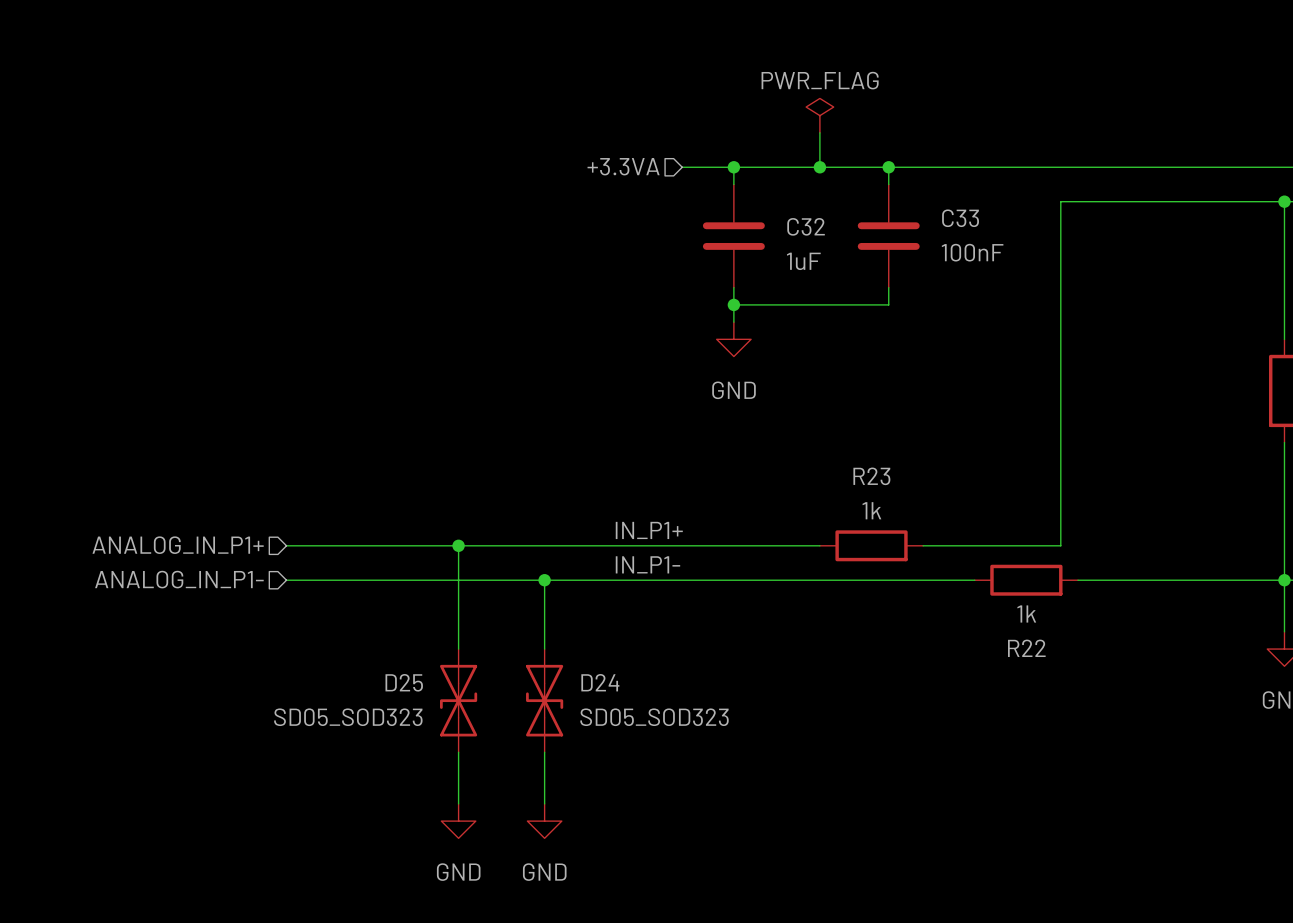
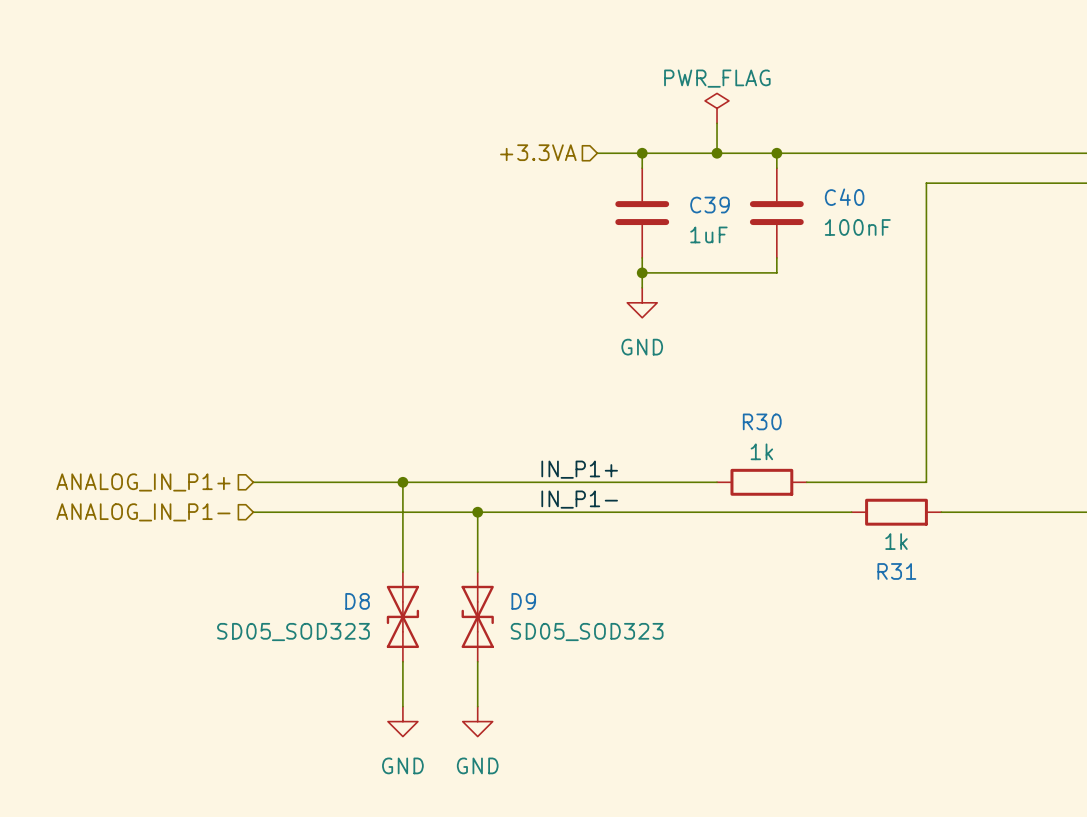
C33 name: C33 (960, 218) -> C40 (844, 197)
C32 name: C32 (806, 226) -> C39 (710, 205)
R23 name: R23 (871, 476) -> R30 (762, 421)
R22 name: R22 (1026, 648) -> R31 (896, 571)
D25 name: D25 (404, 682) -> D8 (357, 601)
D24 name: D24 (600, 682) -> D9 (523, 601)

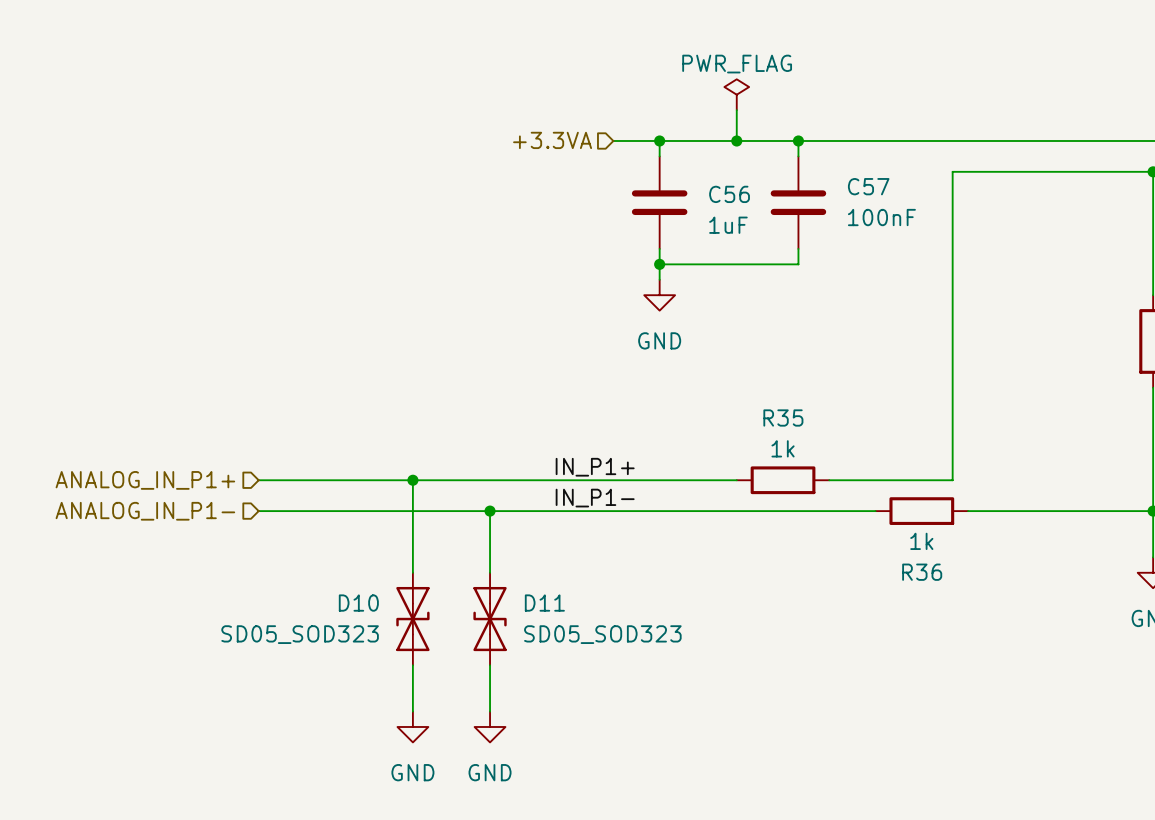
C40 name: C40 (844, 197) -> C57 (868, 186)
C39 name: C39 (710, 205) -> C56 (729, 194)
R30 name: R30 (762, 421) -> R35 (783, 417)
R31 name: R31 (896, 571) -> R36 (922, 572)
D8 name: D8 (357, 601) -> D10 (358, 603)
D9 name: D9 (523, 601) -> D11 (544, 603)

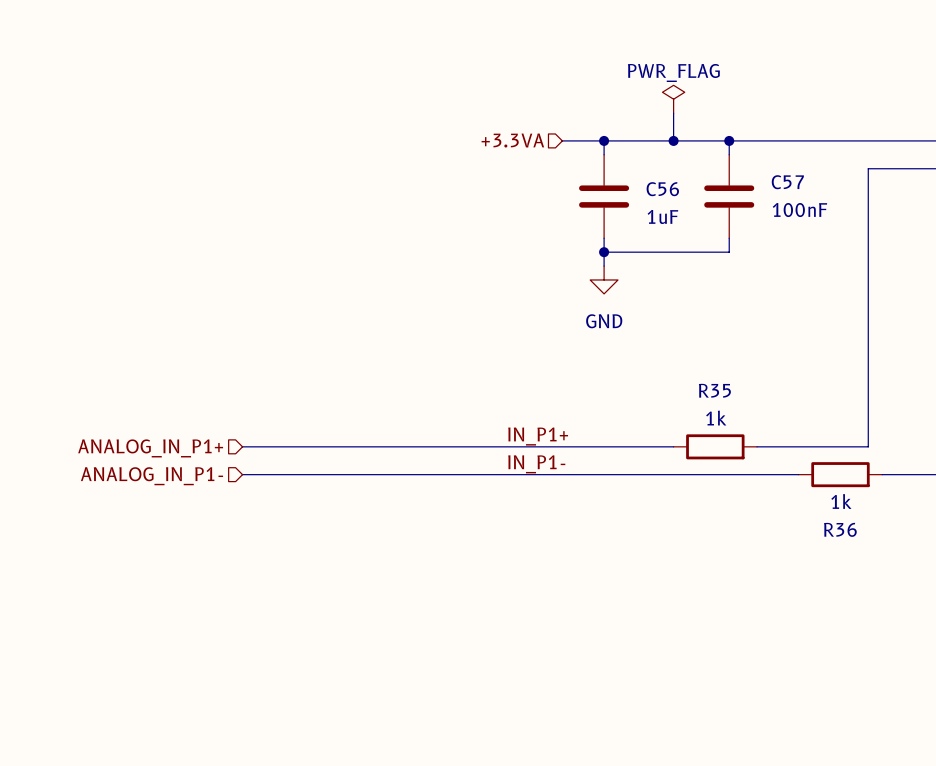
wire: (412, 480) (412, 572) -> none
junction: (412, 480) -> none
wire: (490, 511) (490, 572) -> none
junction: (490, 511) -> none
D10: SD05_SOD323 (412, 619) -> none
D11: SD05_SOD323 (490, 619) -> none
wire: (412, 665) (412, 711) -> none
wire: (490, 665) (490, 711) -> none
power symbol: GND (412, 726) -> none
power symbol: GND (490, 726) -> none

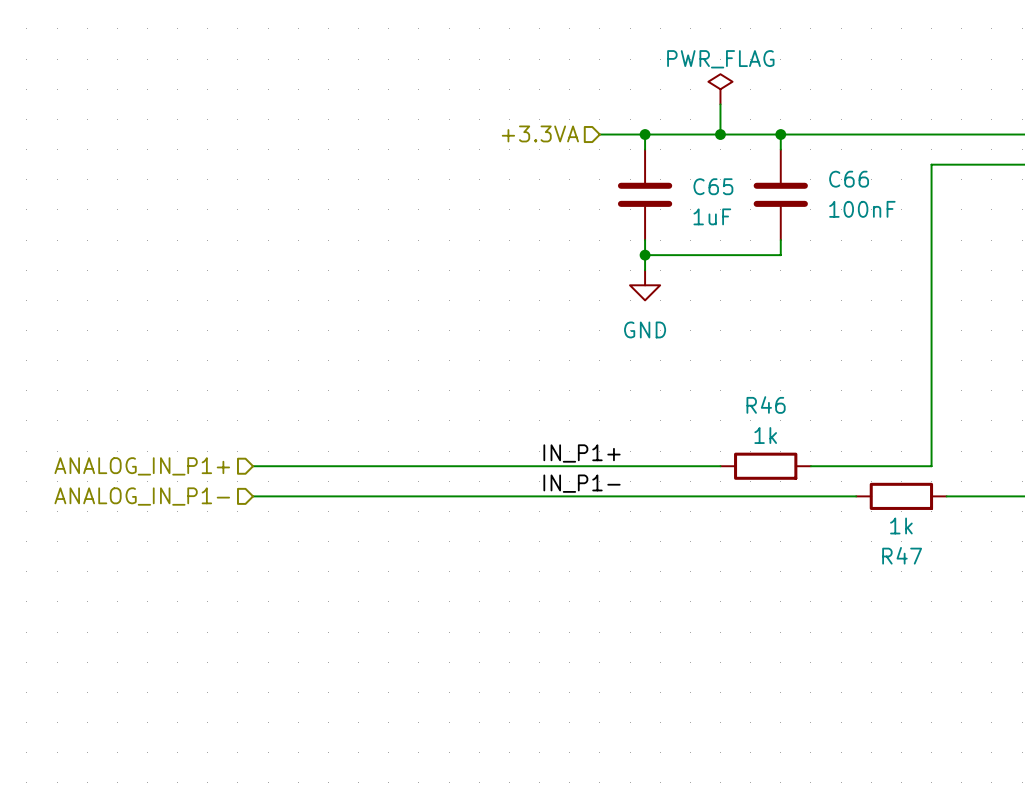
C57 name: C57 (787, 182) -> C66 (849, 179)
C56 name: C56 (662, 189) -> C65 (713, 186)
R35 name: R35 (714, 390) -> R46 (766, 404)
R36 name: R36 (840, 529) -> R47 (902, 555)

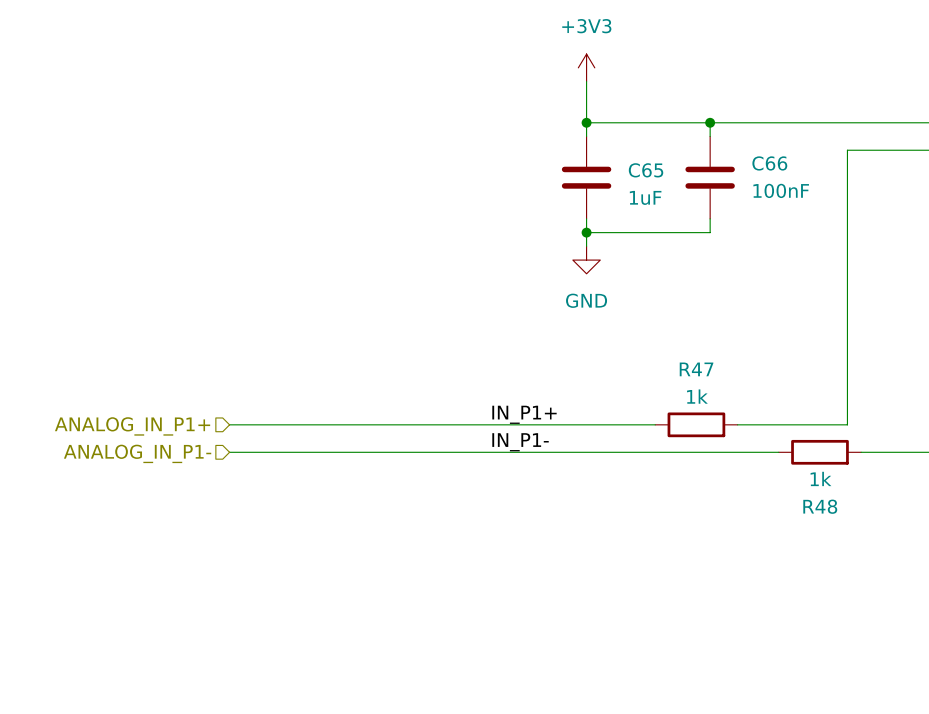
power symbol: none -> +3V3 (586, 67)
power symbol: PWR_FLAG (720, 89) -> none
wire: (720, 104) (720, 134) -> none
hierarchical label: +3.3VA (540, 133) -> none
wire: (599, 134) (645, 134) -> (586, 81) (586, 122)
junction: (720, 134) -> none
R46 name: R46 (766, 404) -> R47 (696, 369)
R47 name: R47 (902, 555) -> R48 (820, 506)

